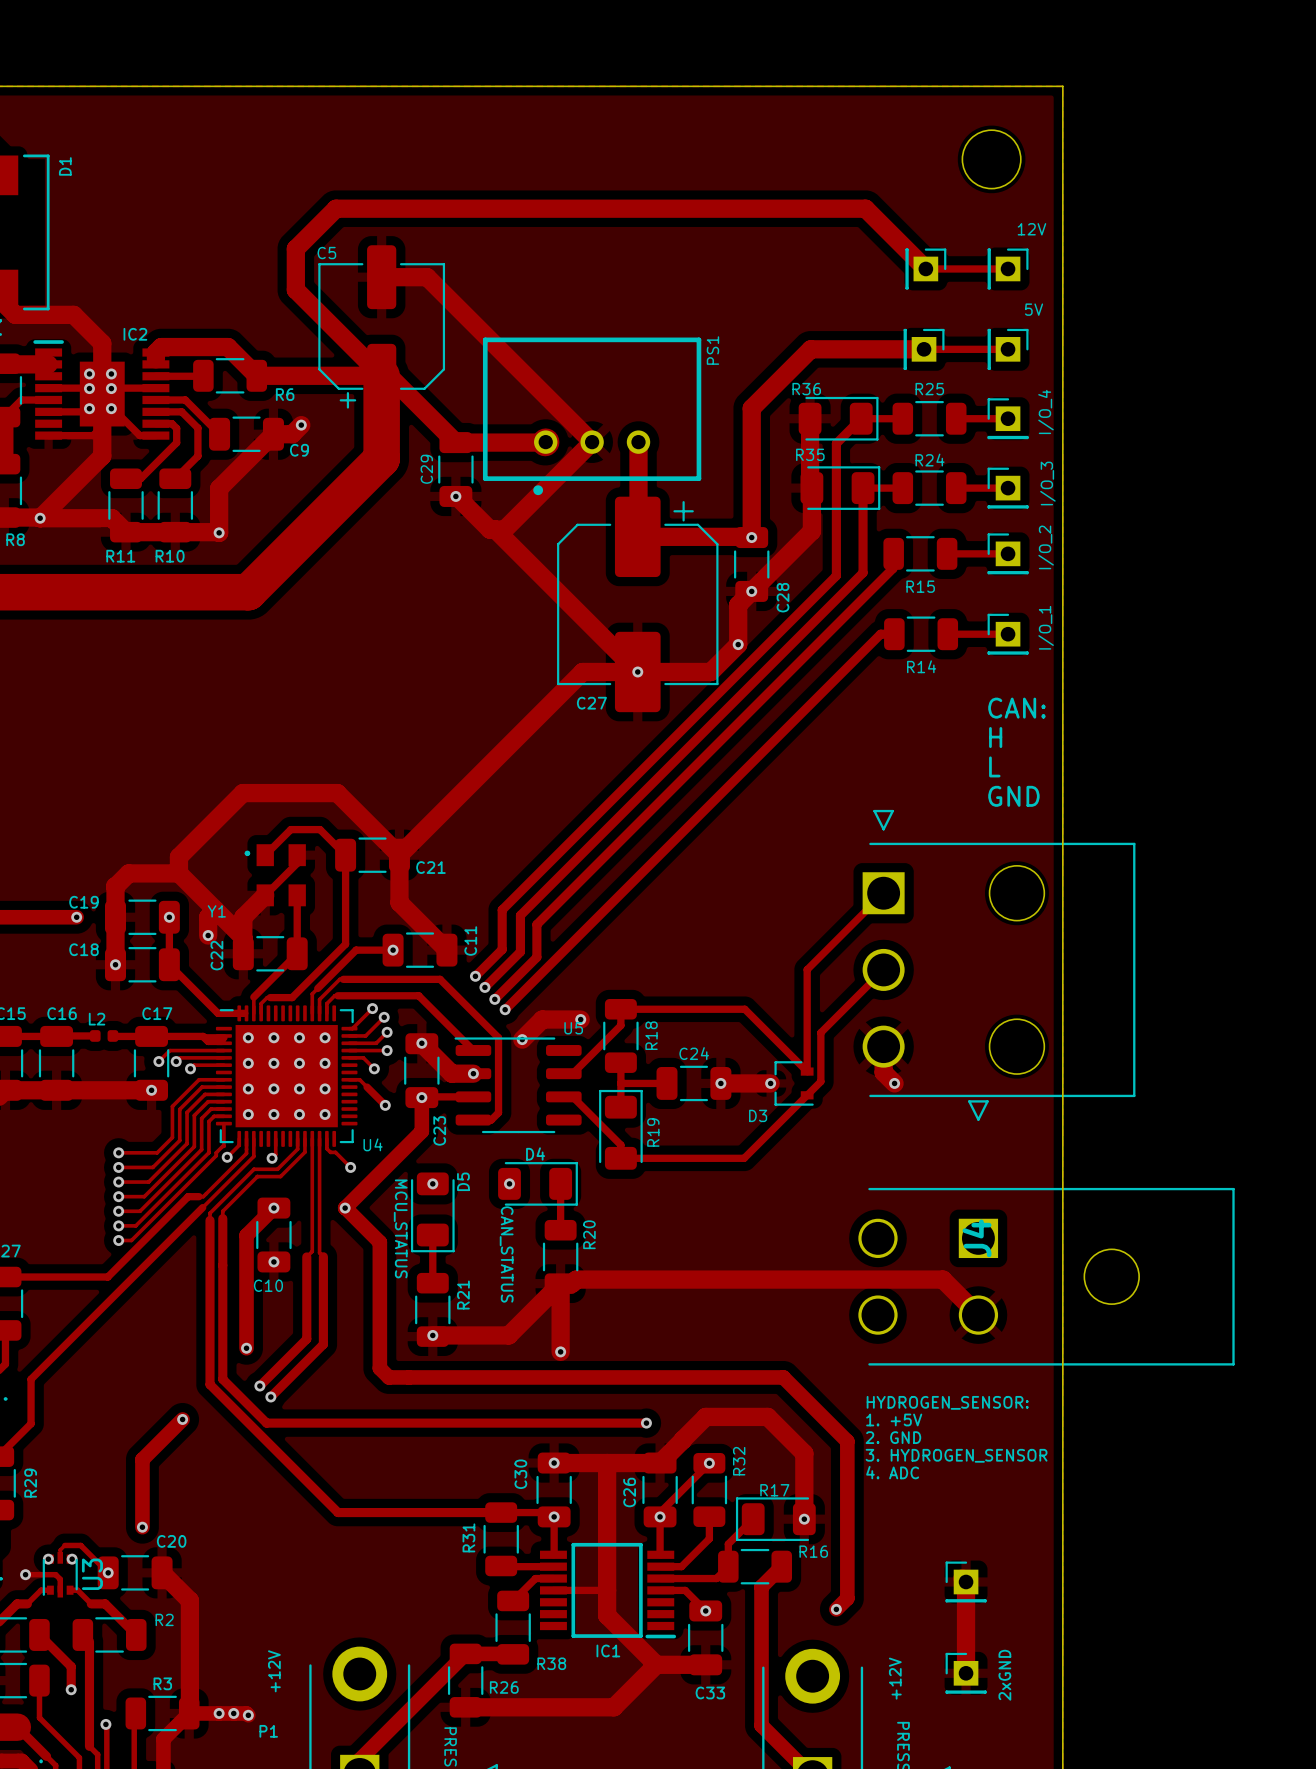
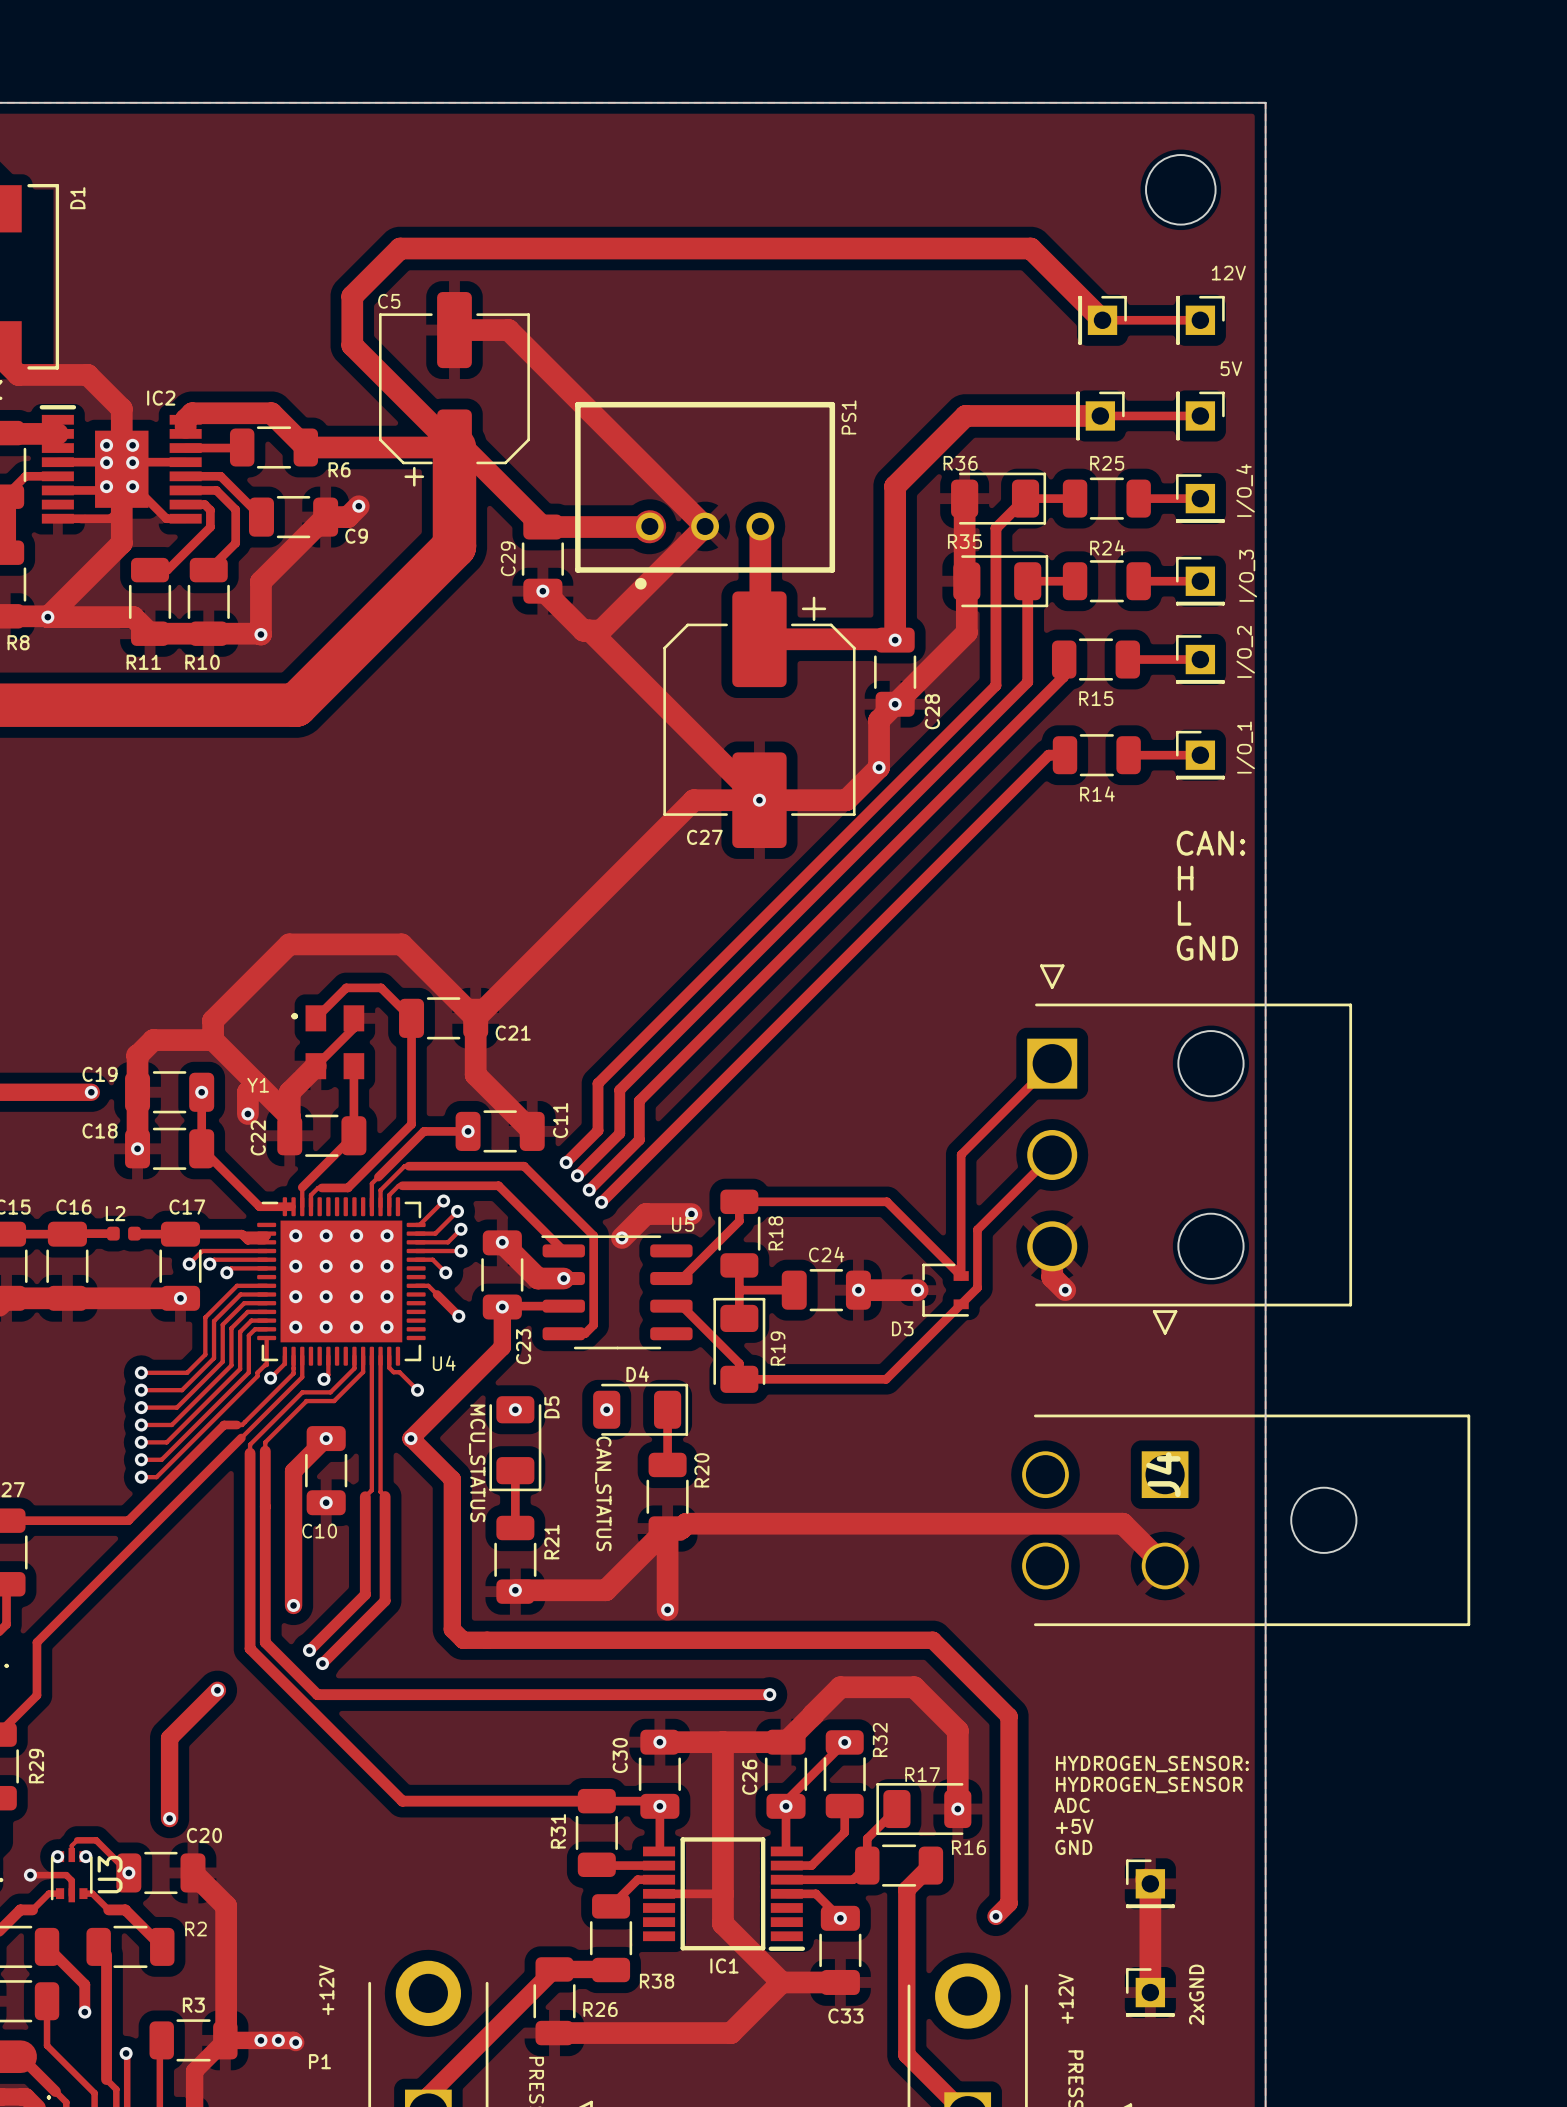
text position: HYDROGEN_SENSOR: (947, 1402) -> HYDROGEN_SENSOR: (1152, 1764)
text: 1. +5V (894, 1419) -> none
text: 2. GND (893, 1437) -> none
text: 3. HYDROGEN_SENSOR (956, 1455) -> none
text: 4. ADC (892, 1472) -> none
text: none -> HYDROGEN_SENSOR (1149, 1785)
text: none -> ADC (1071, 1805)
text: none -> +5V (1074, 1826)
text: none -> GND (1073, 1847)

